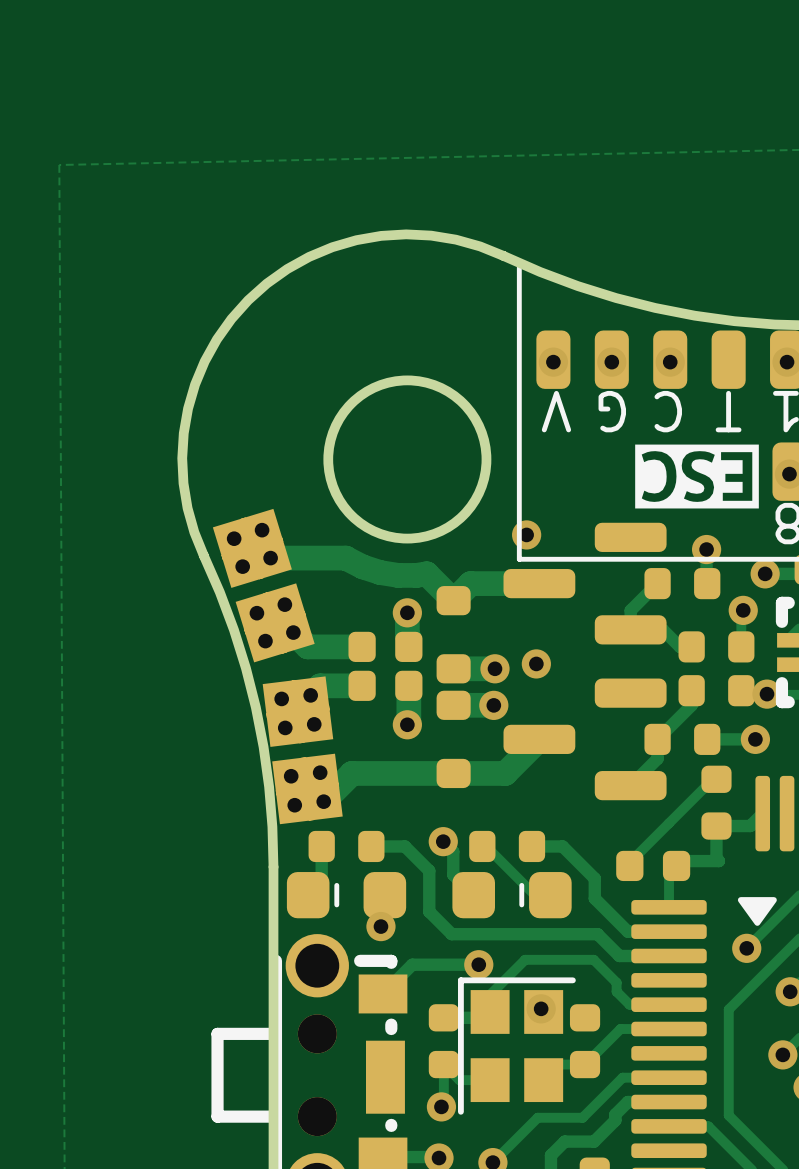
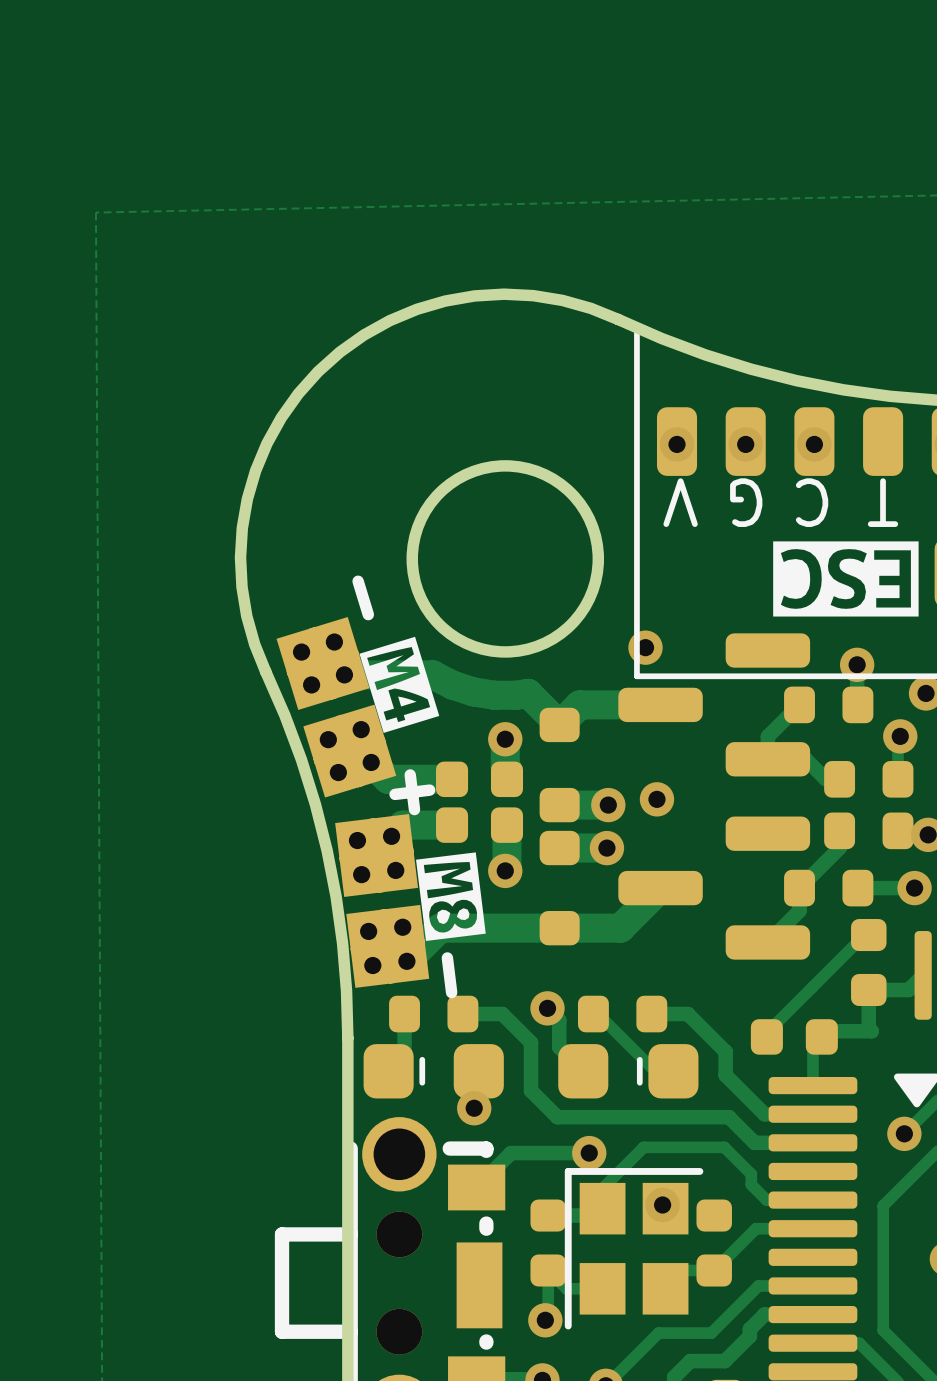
text: none -> - (363, 597)
drawing: none -> [359, 636, 440, 733]
text: none -> + (412, 792)
drawing: none -> [416, 852, 486, 941]
text: none -> - (449, 975)

